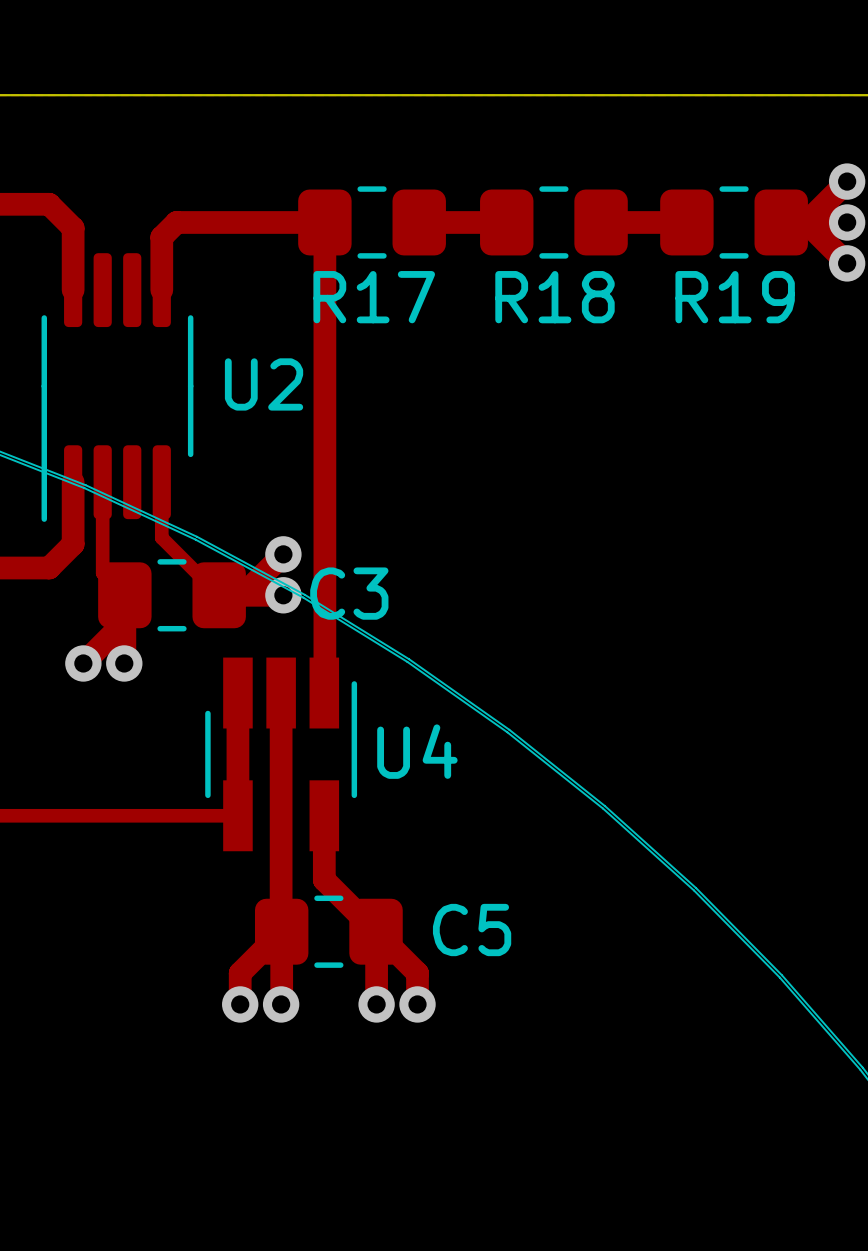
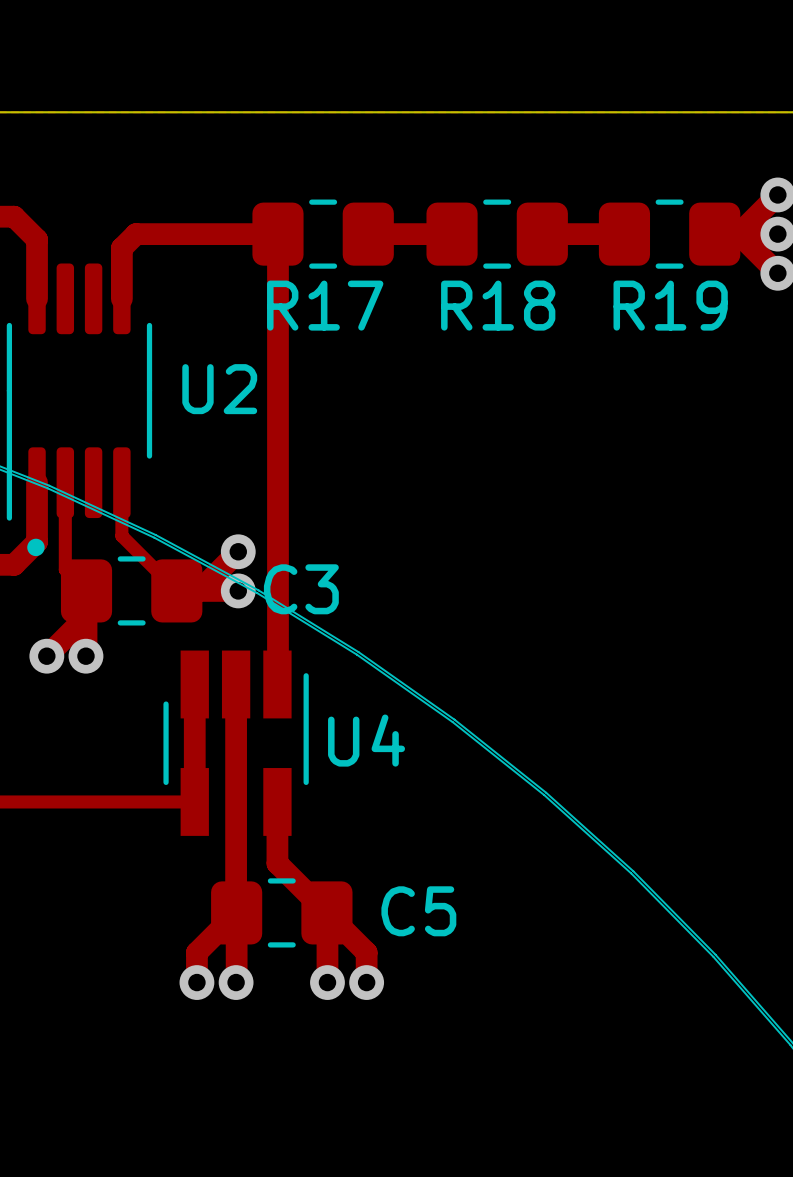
drawing: none -> [27, 538, 45, 557]

